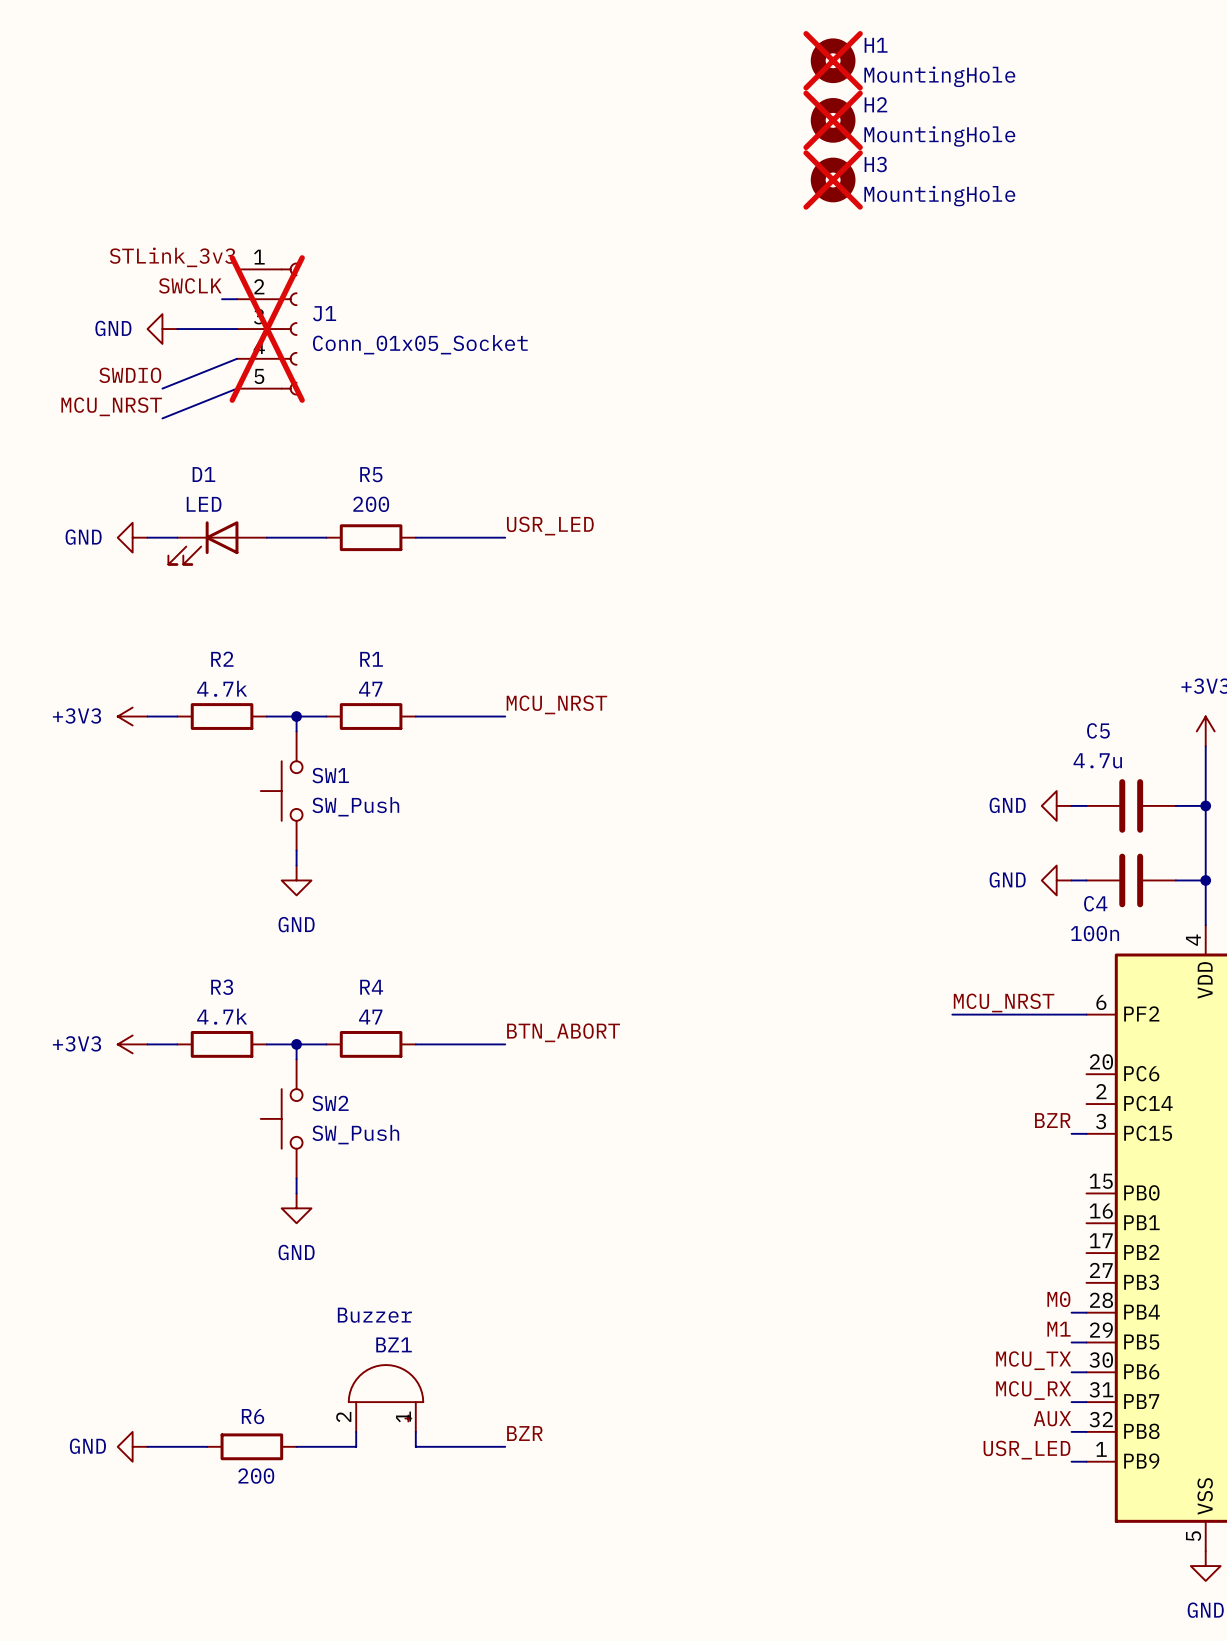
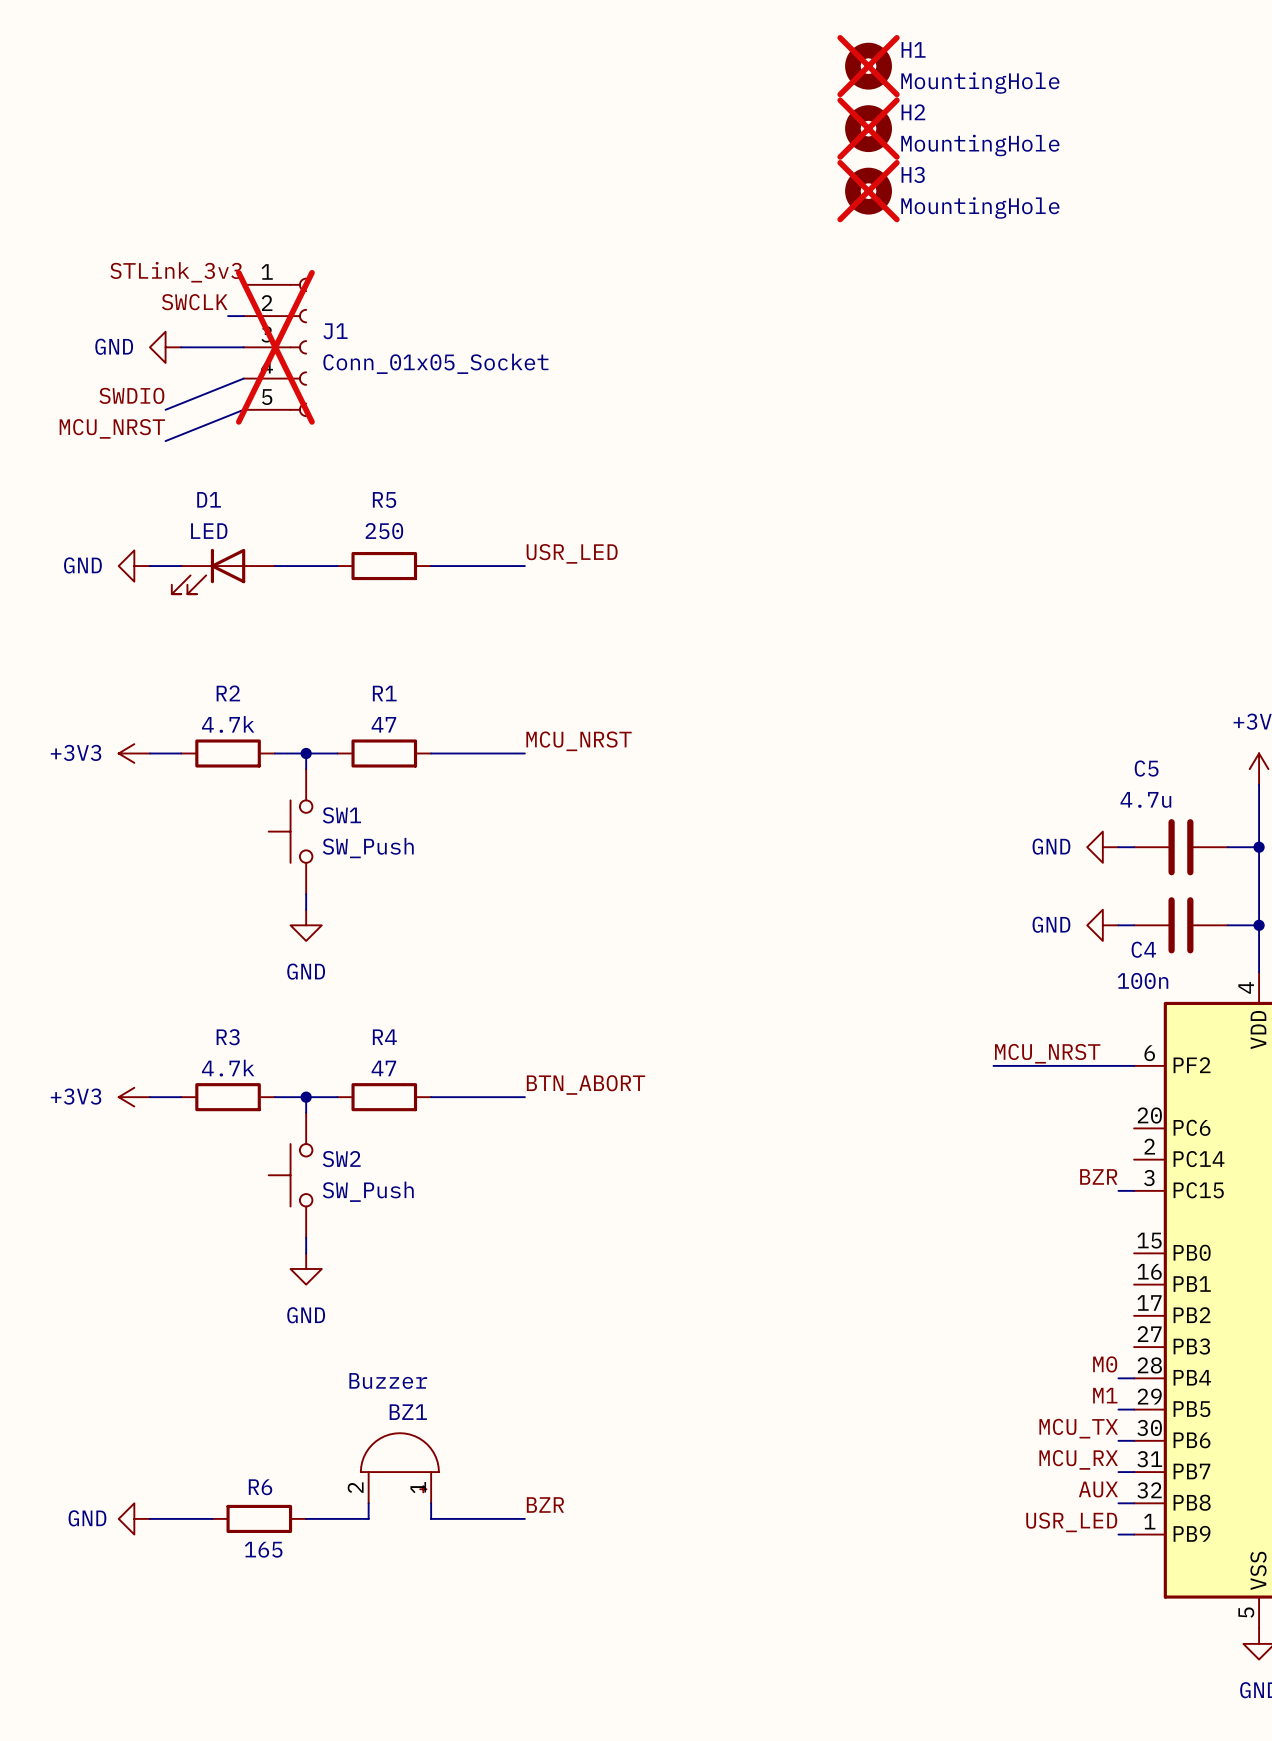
R5 value: 200 (371, 504) -> 250 (384, 531)
R6 value: 200 (256, 1476) -> 165 (263, 1549)

